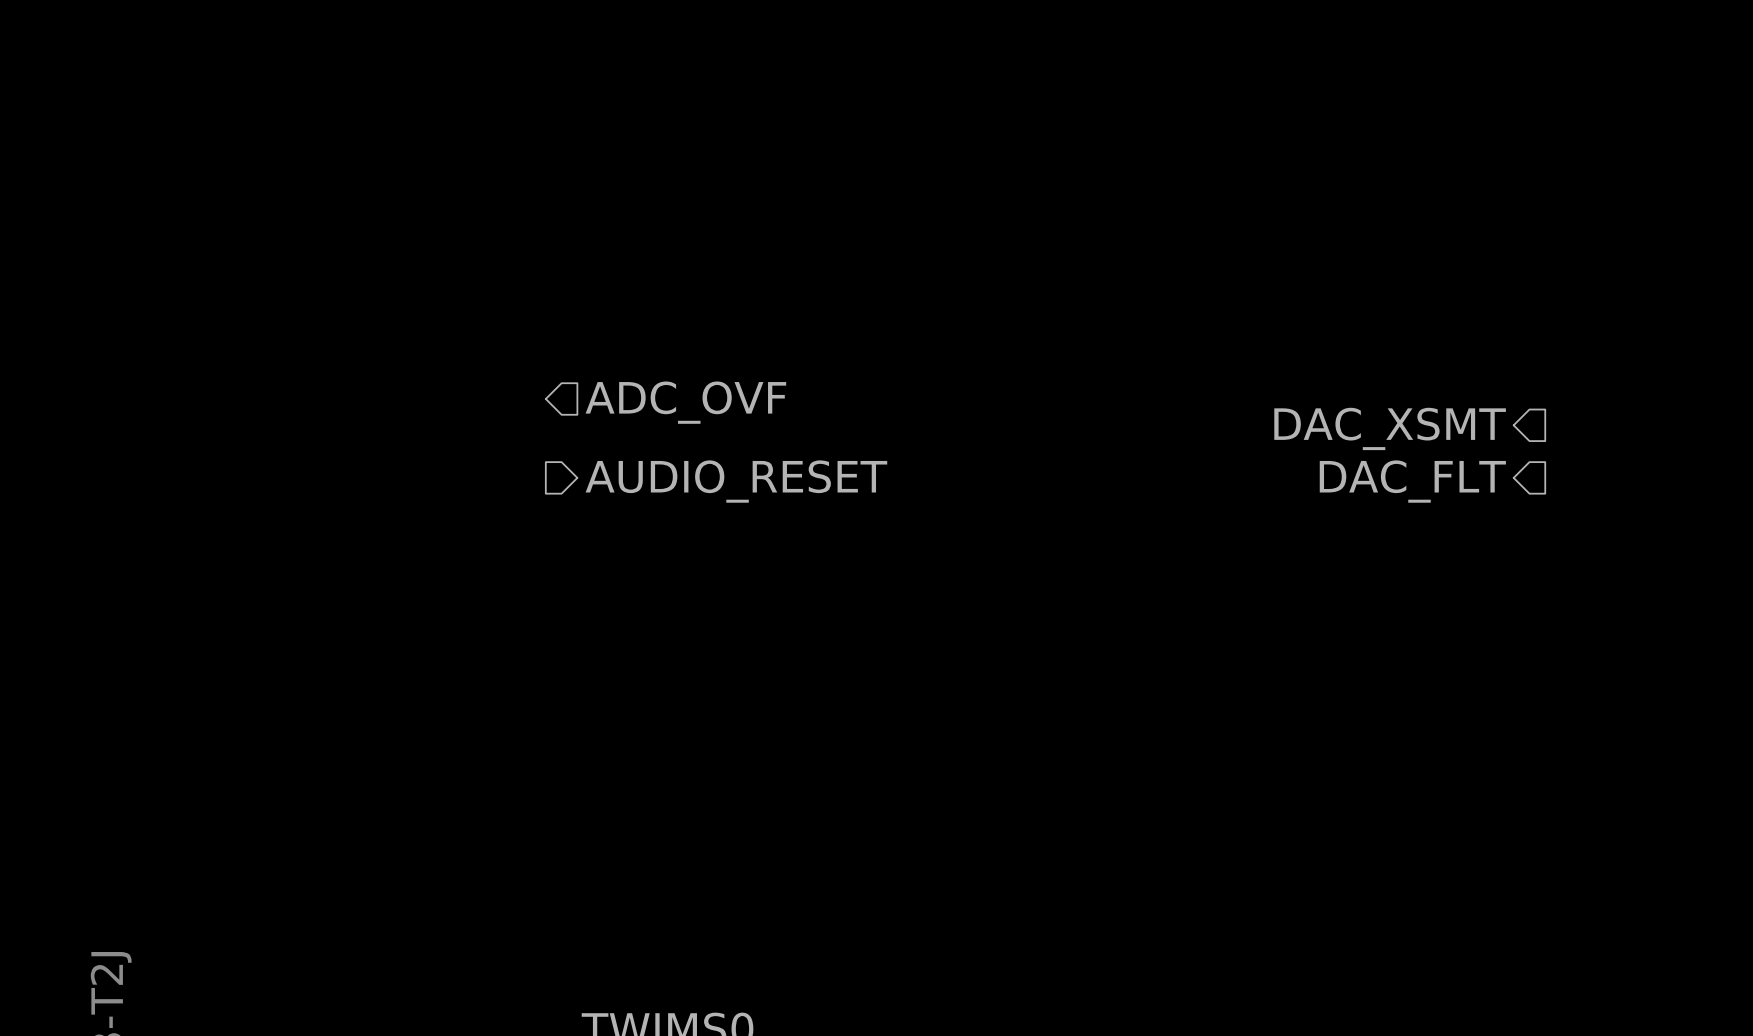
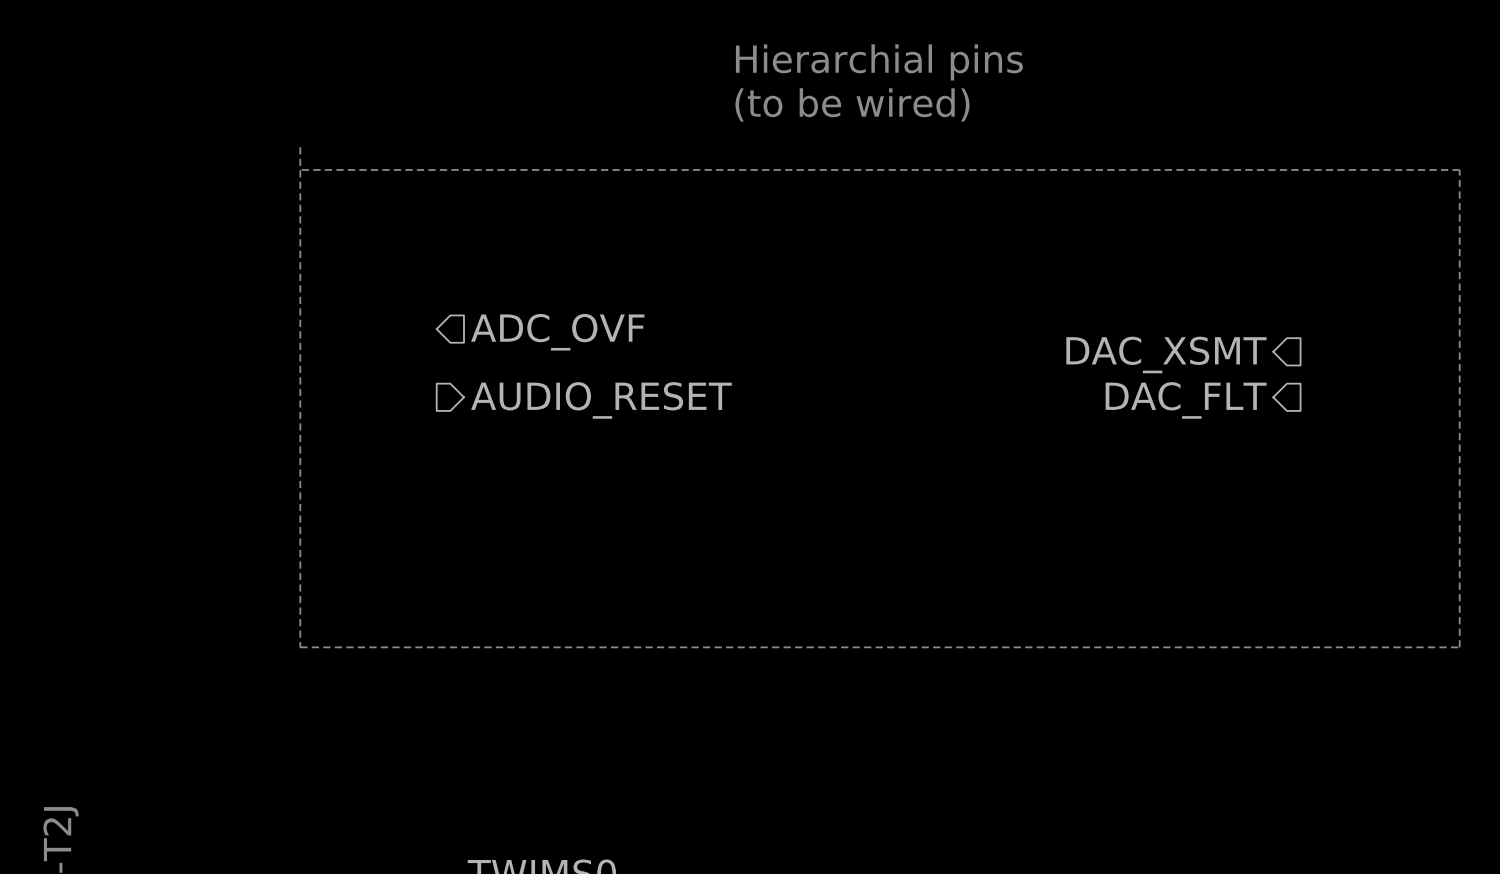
text: none -> Hierarchial pins (879, 62)
text: none -> (to be wired) (852, 104)
line: none -> (300, 147) (300, 647) (1459, 647) (1459, 169) (300, 169)

